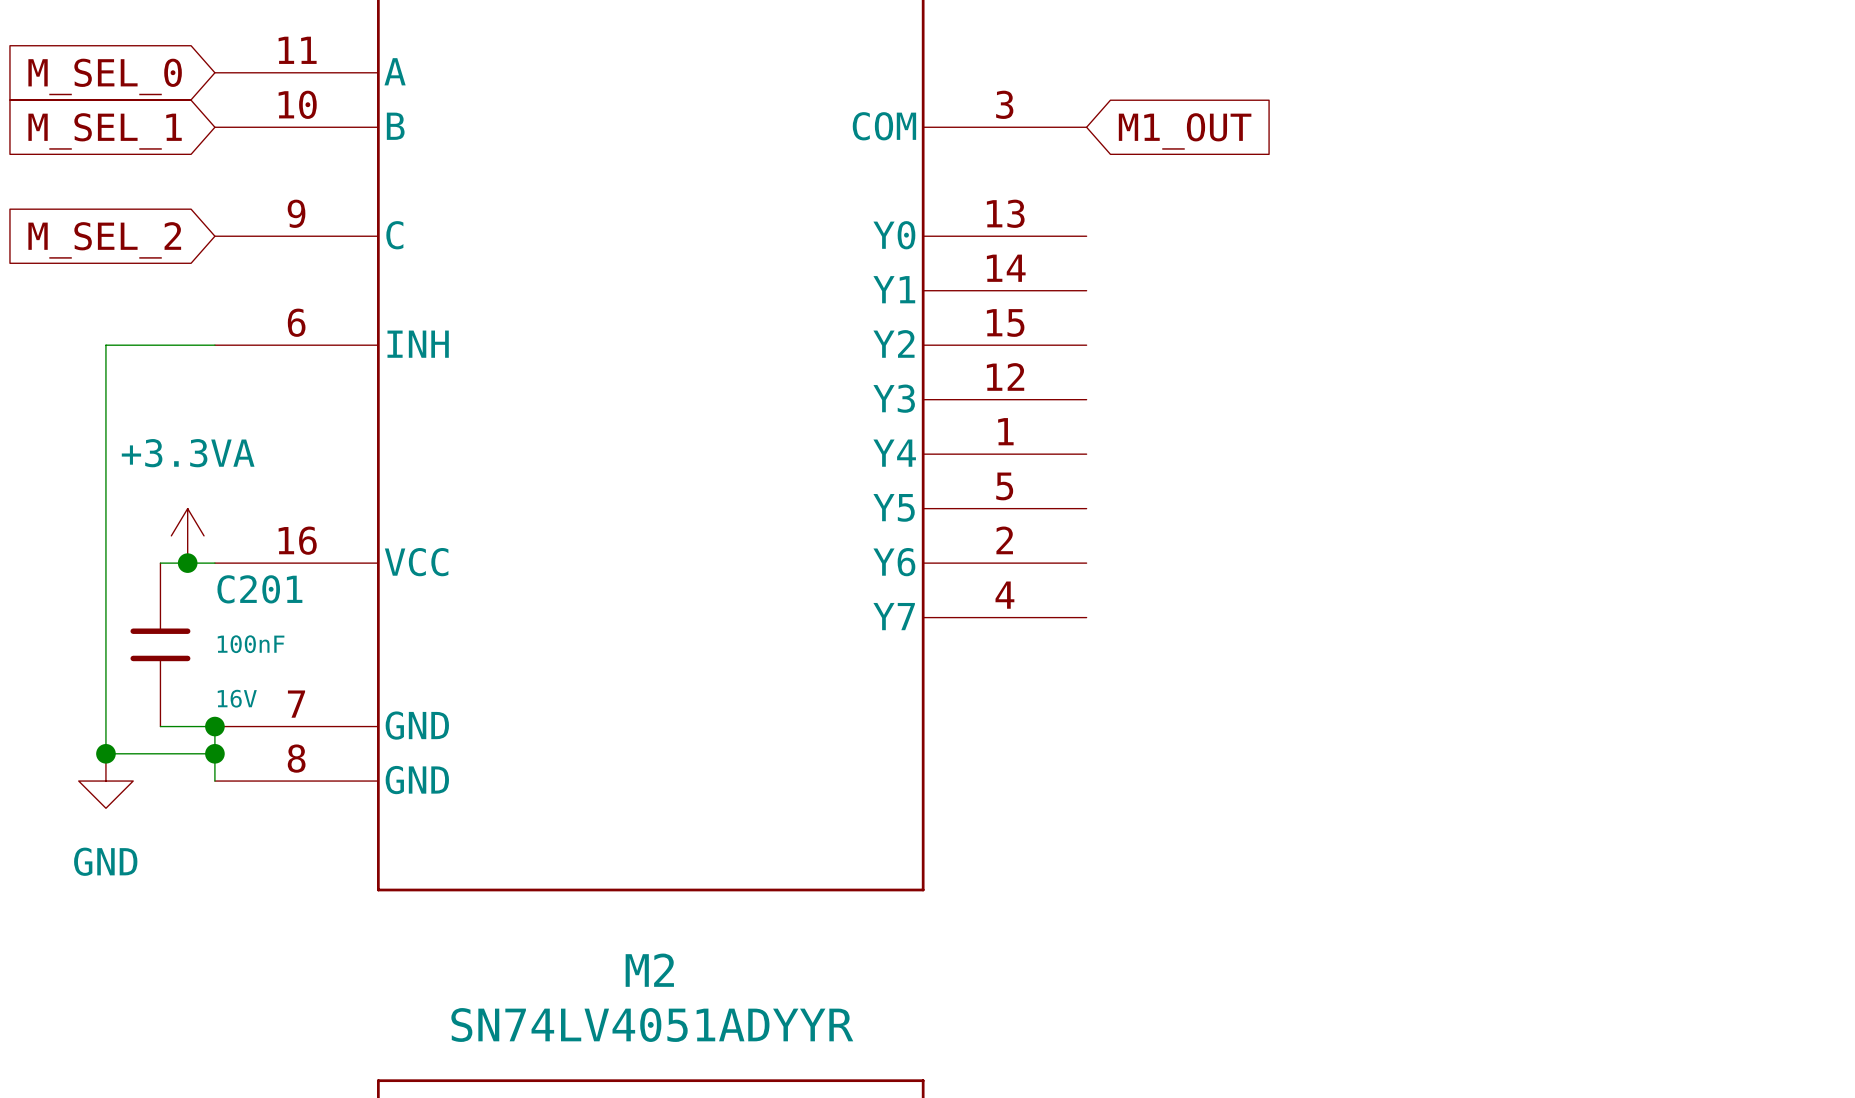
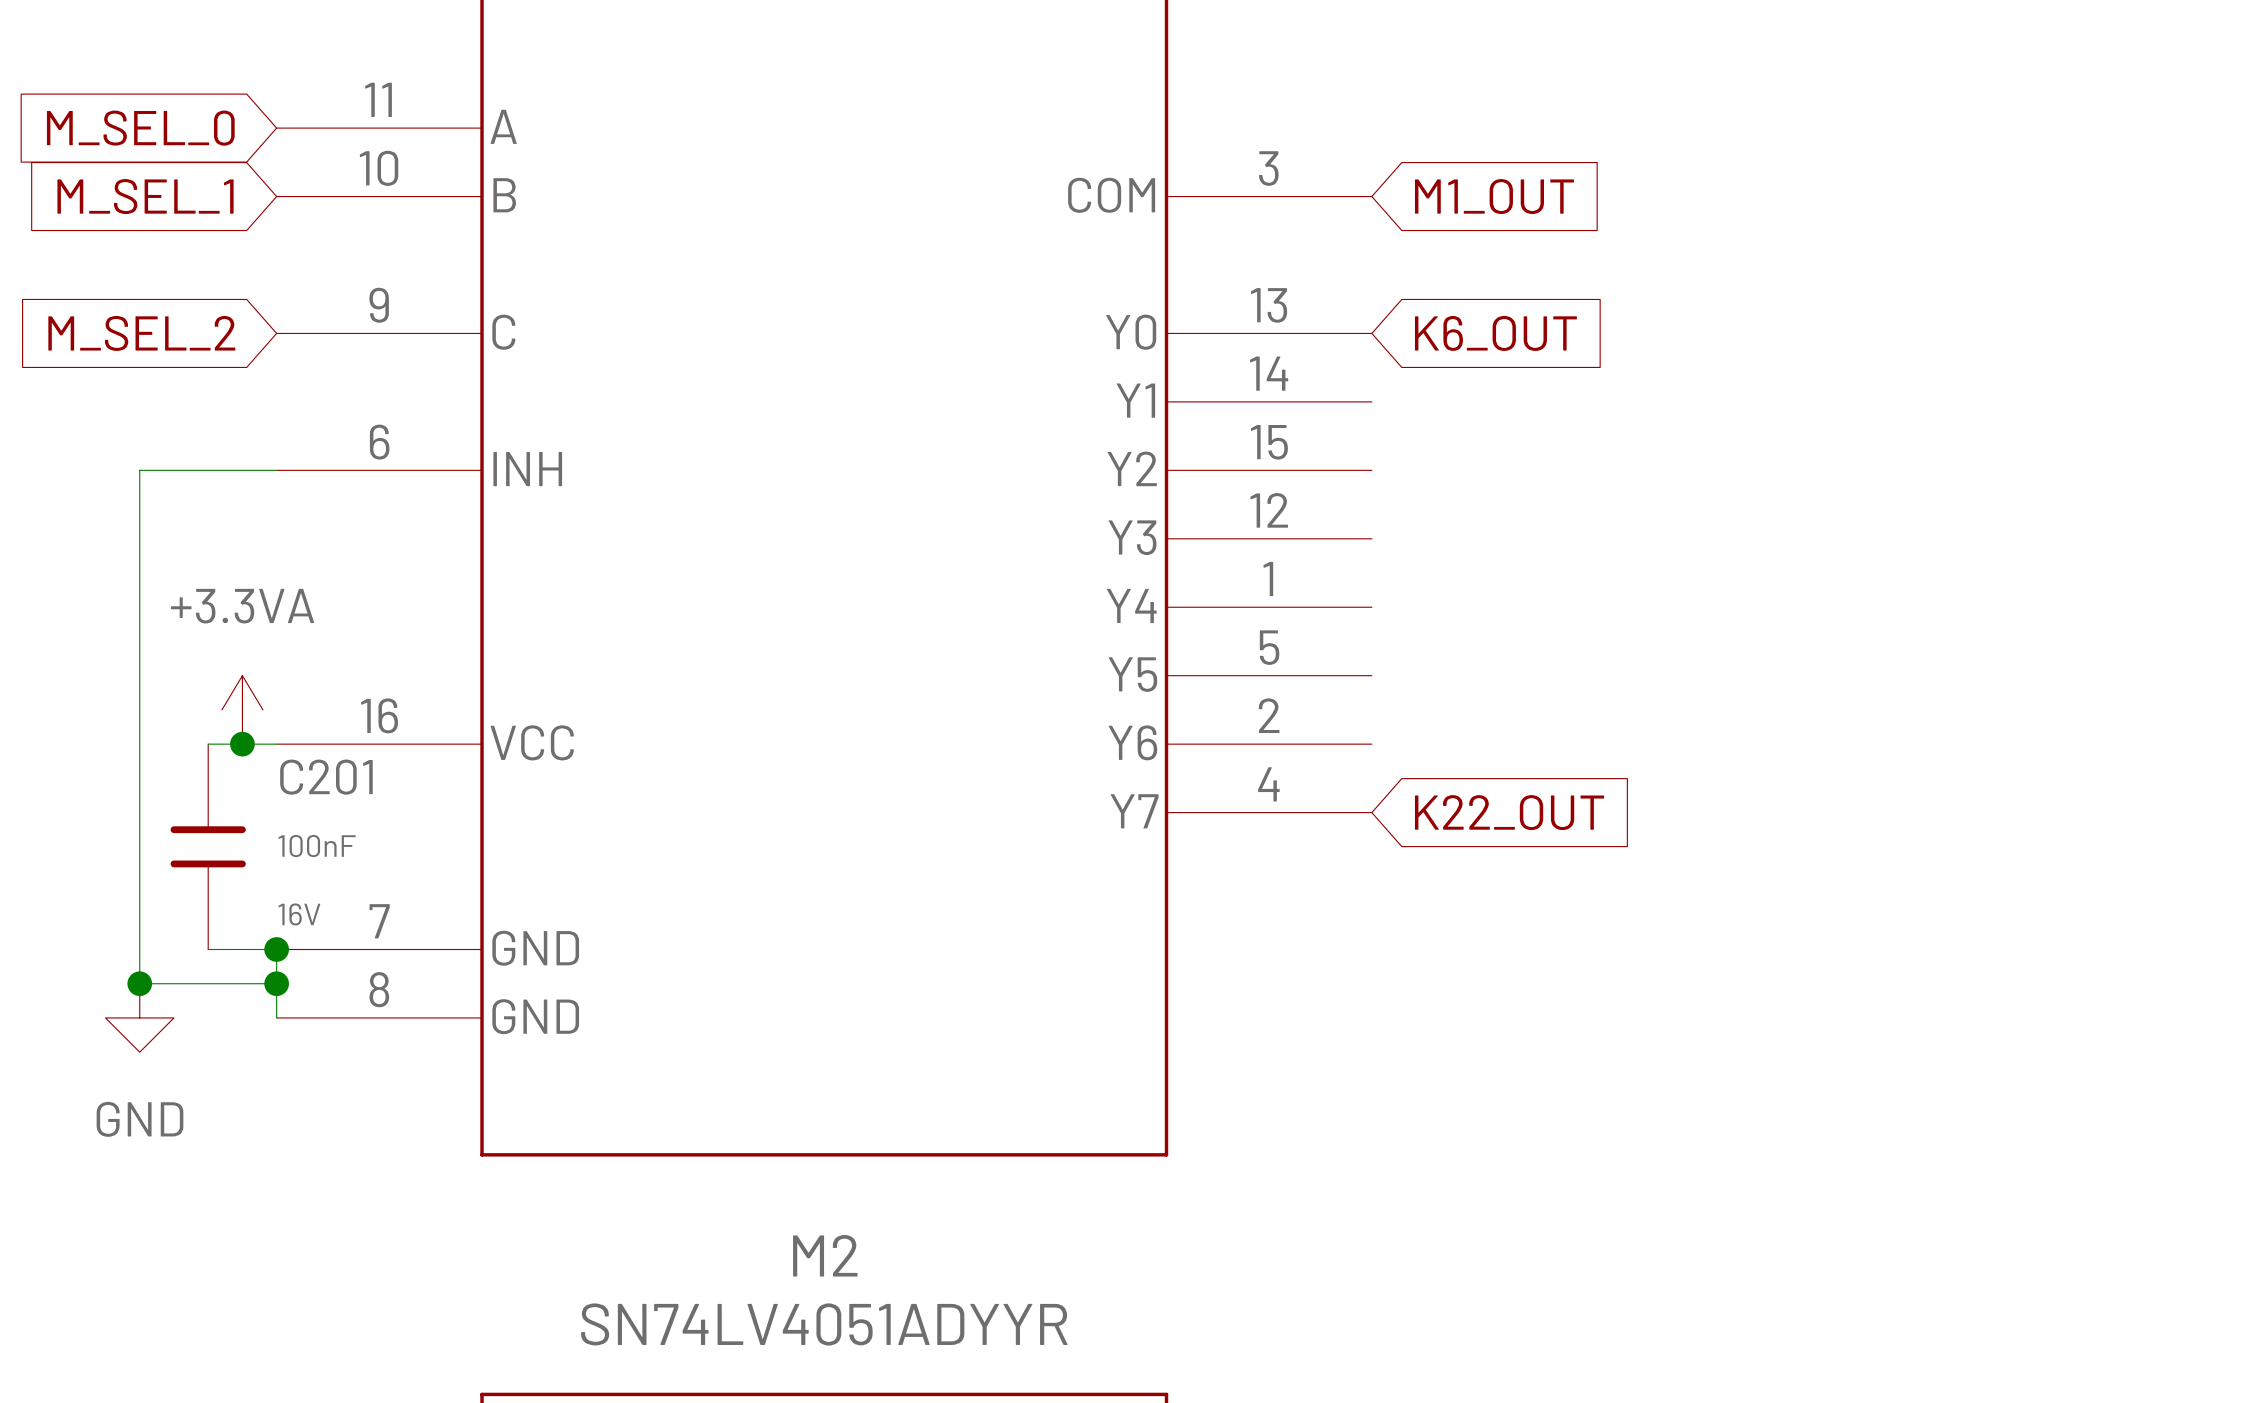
global label: none -> K6_OUT (1495, 333)
global label: none -> K22_OUT (1509, 812)

